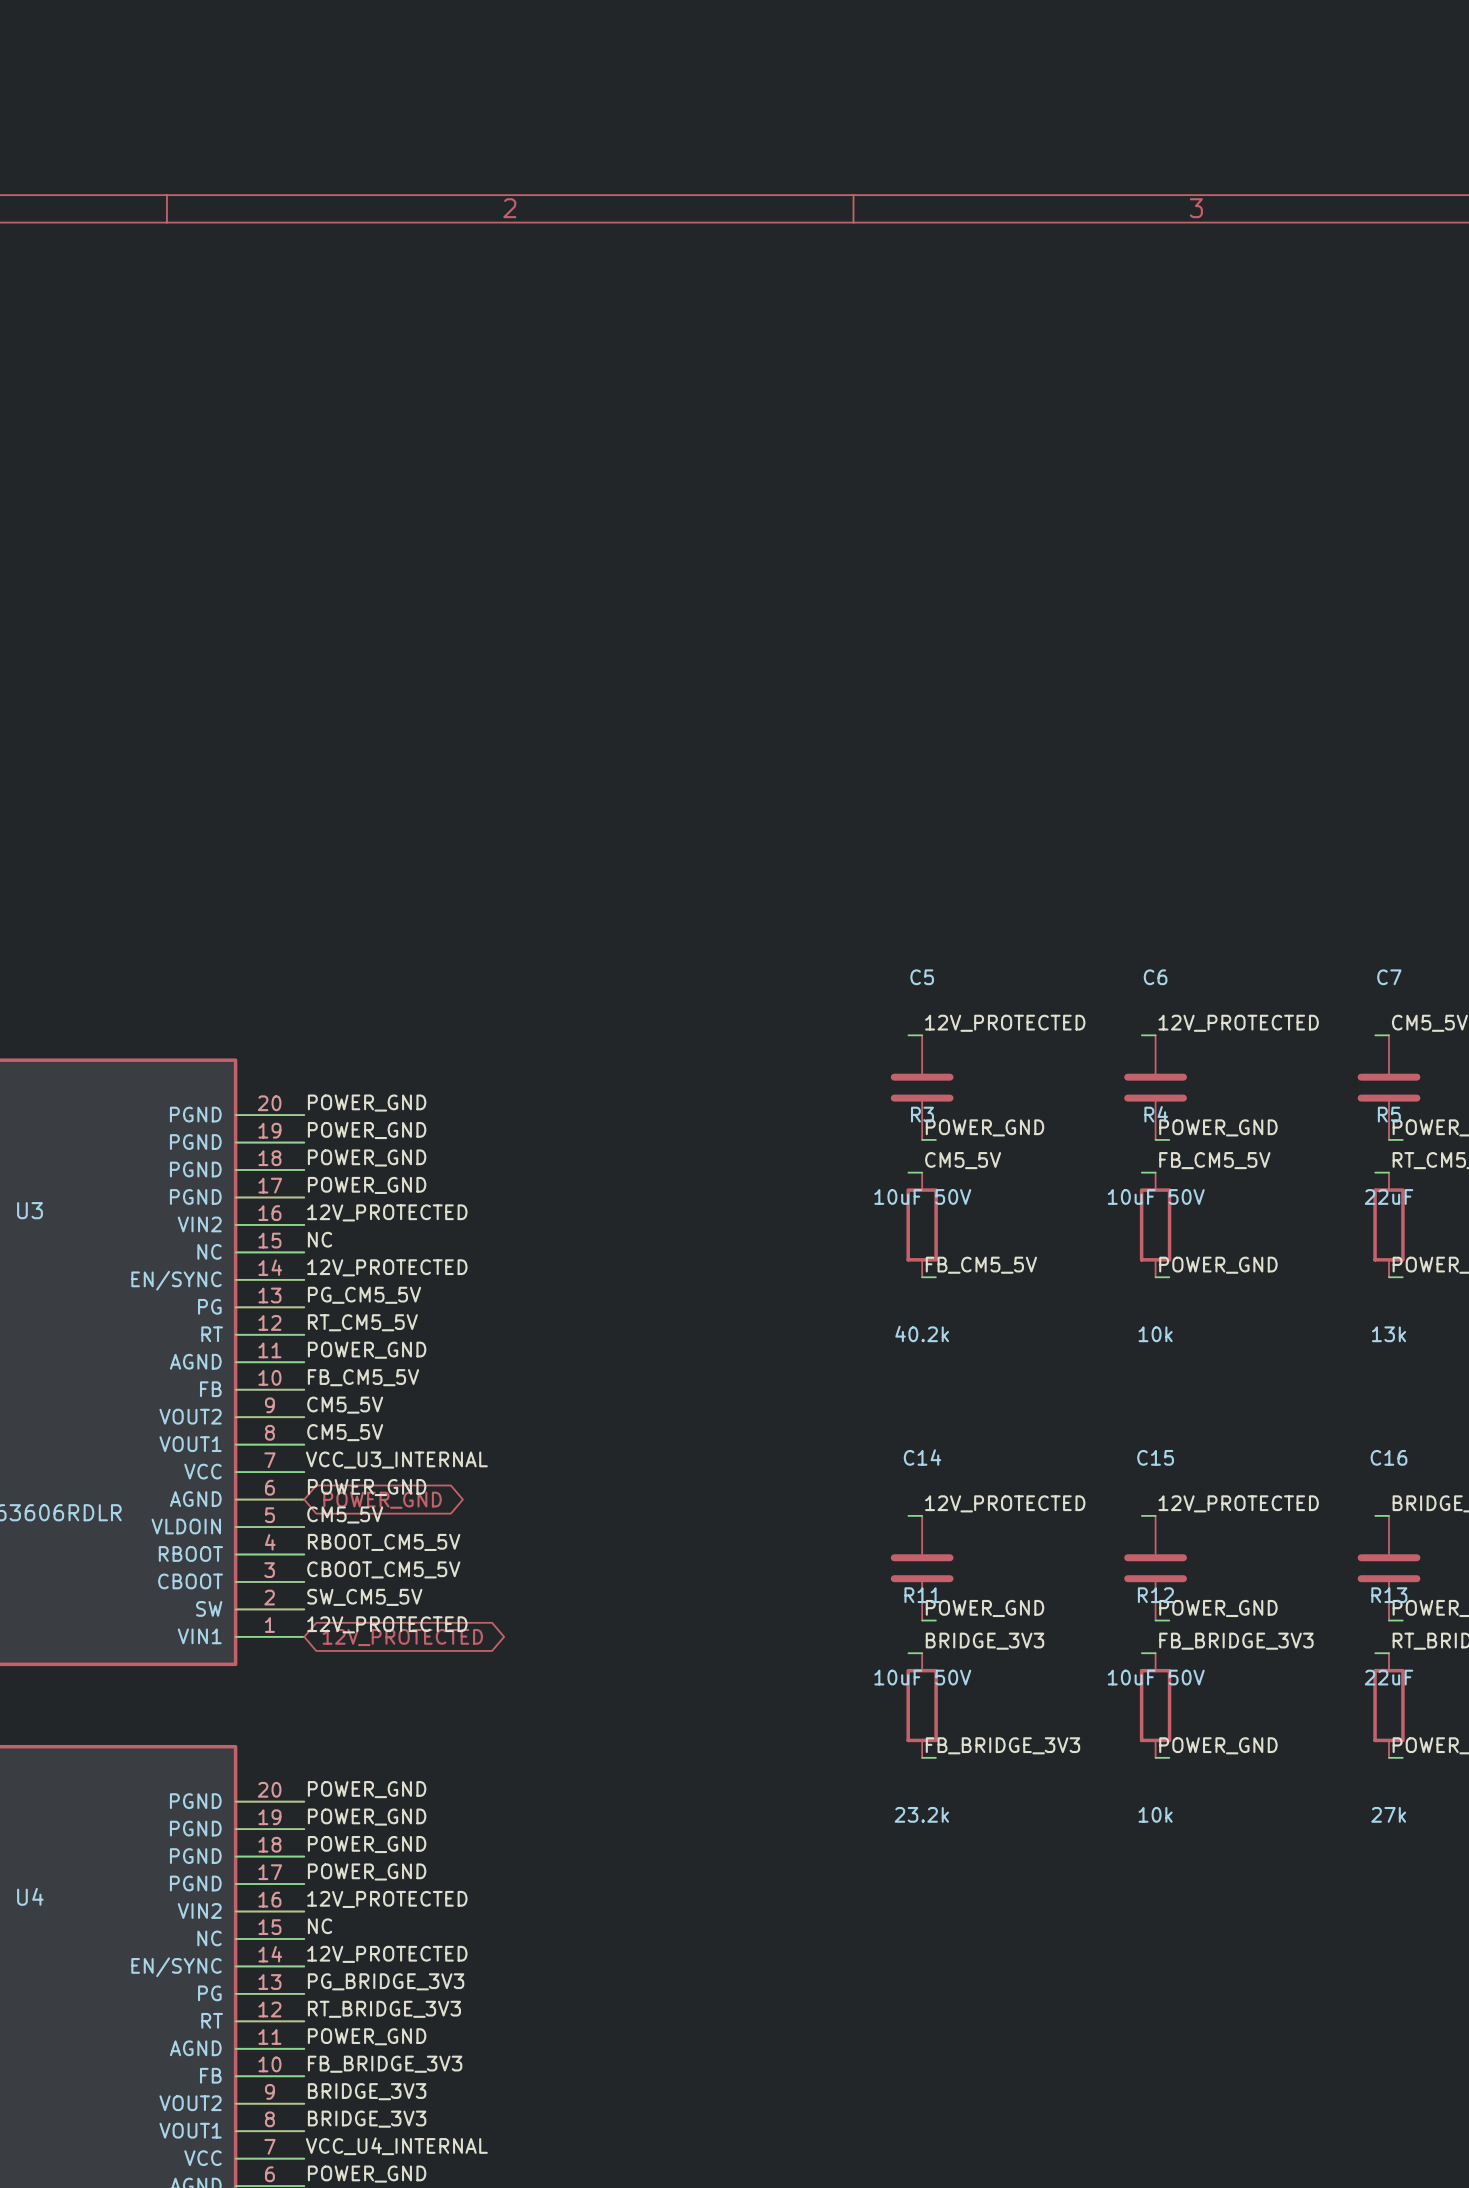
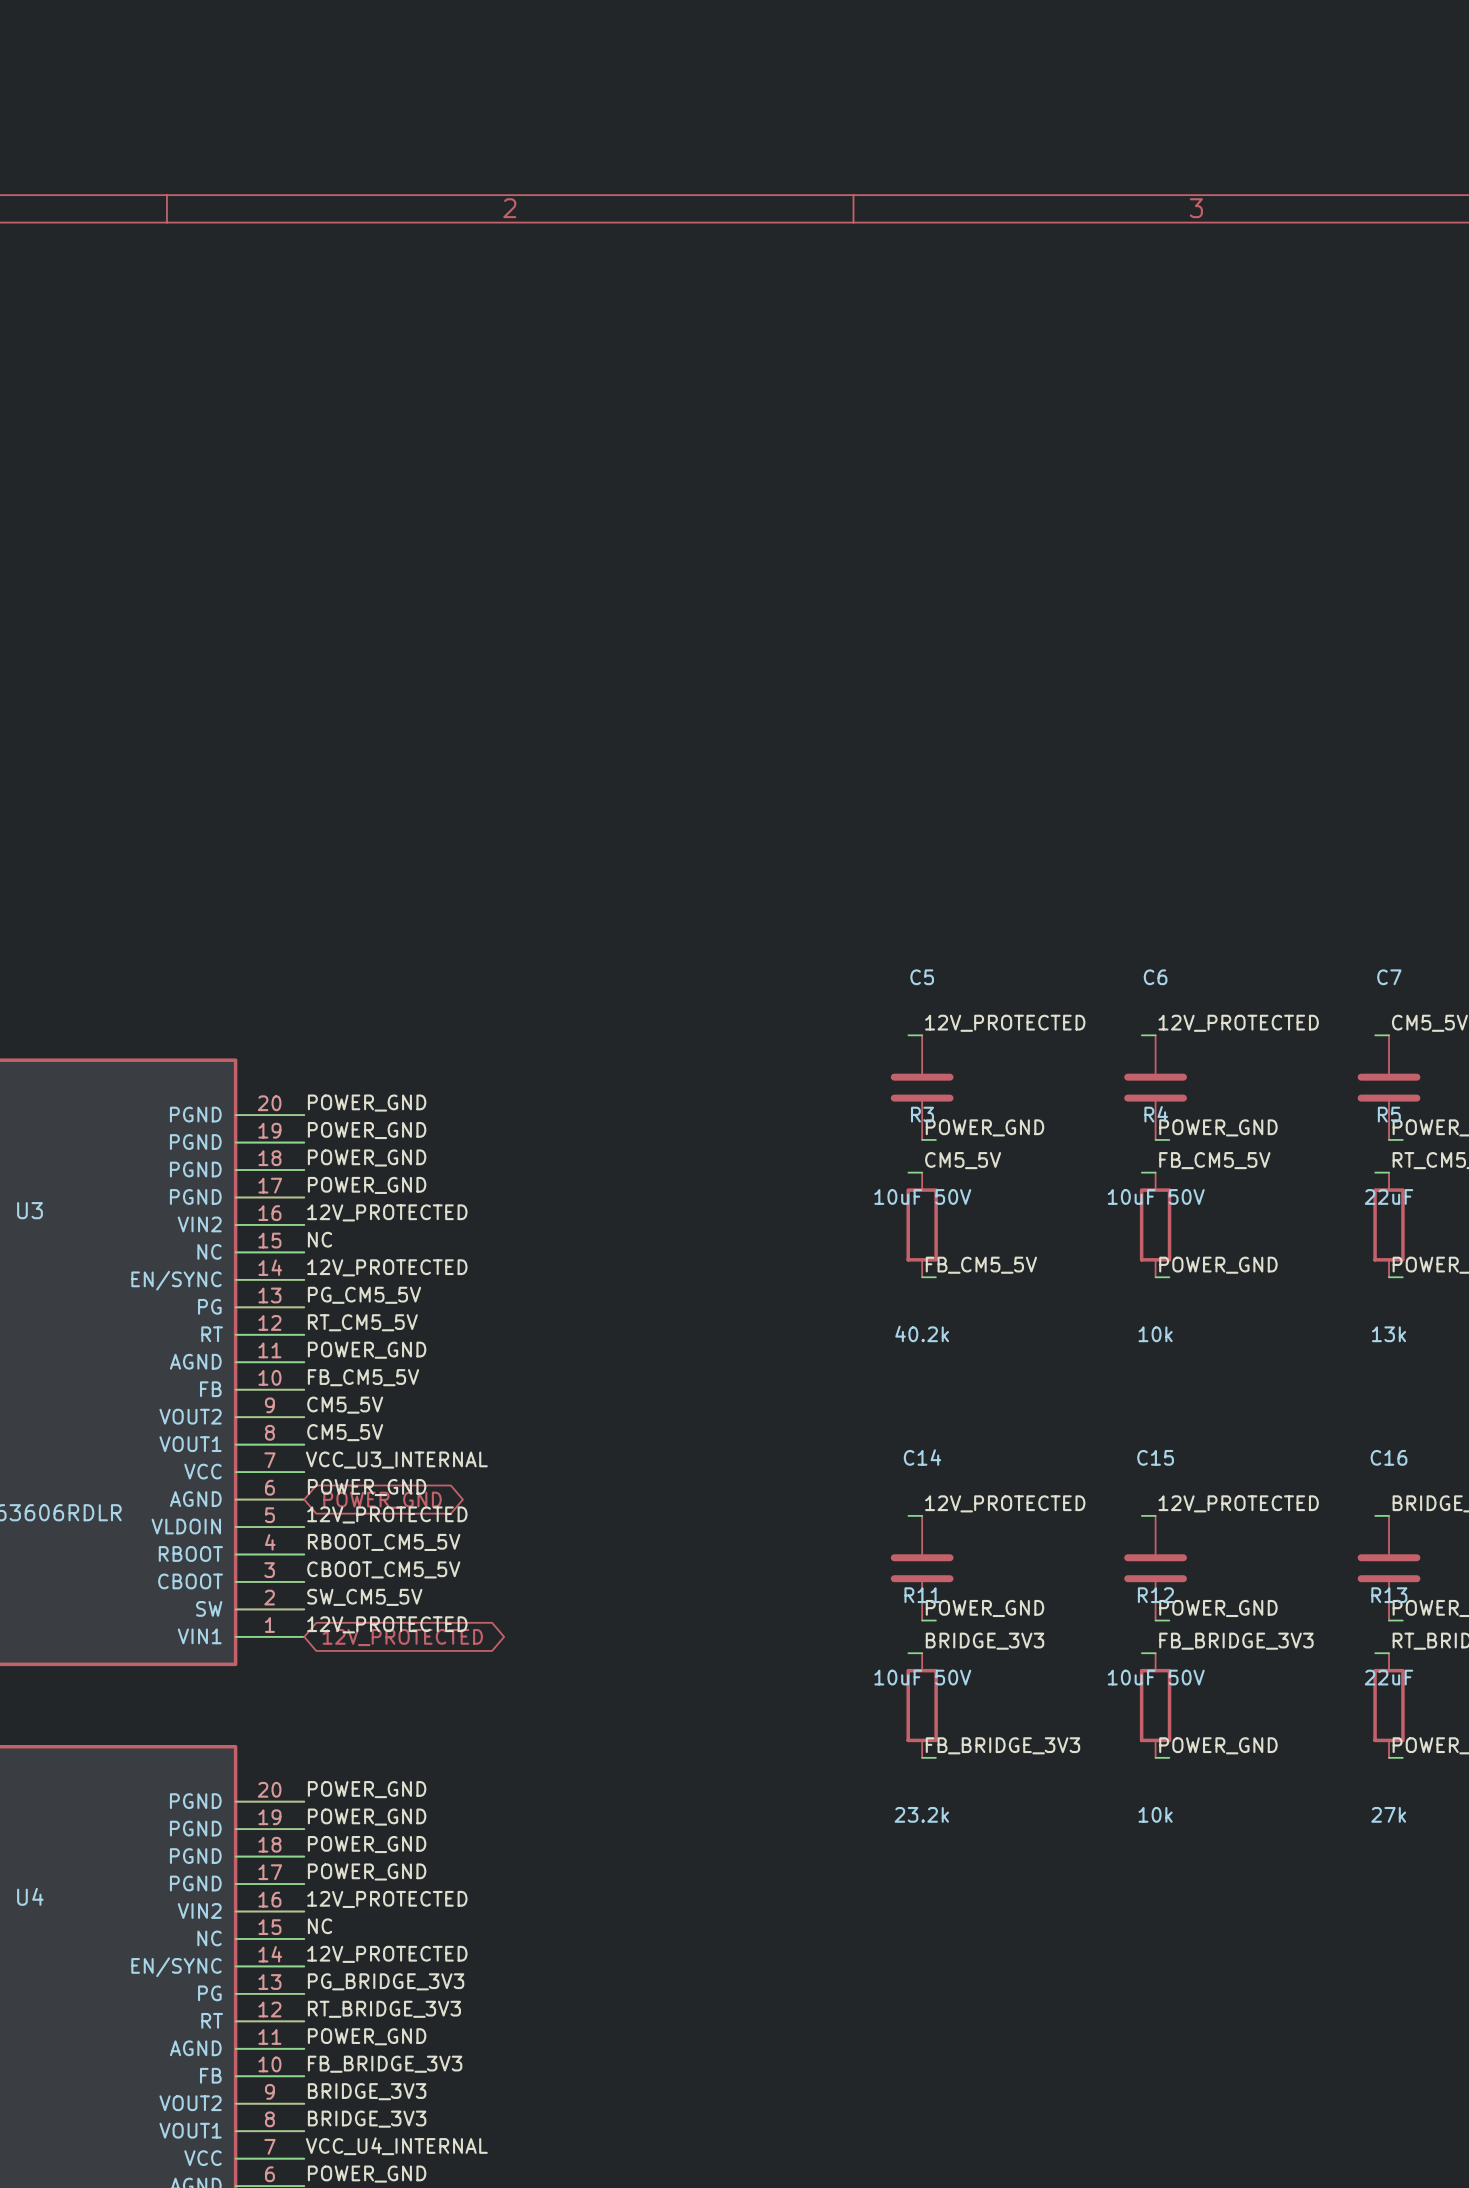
label: CM5_5V (345, 1514) -> 12V_PROTECTED (387, 1514)

